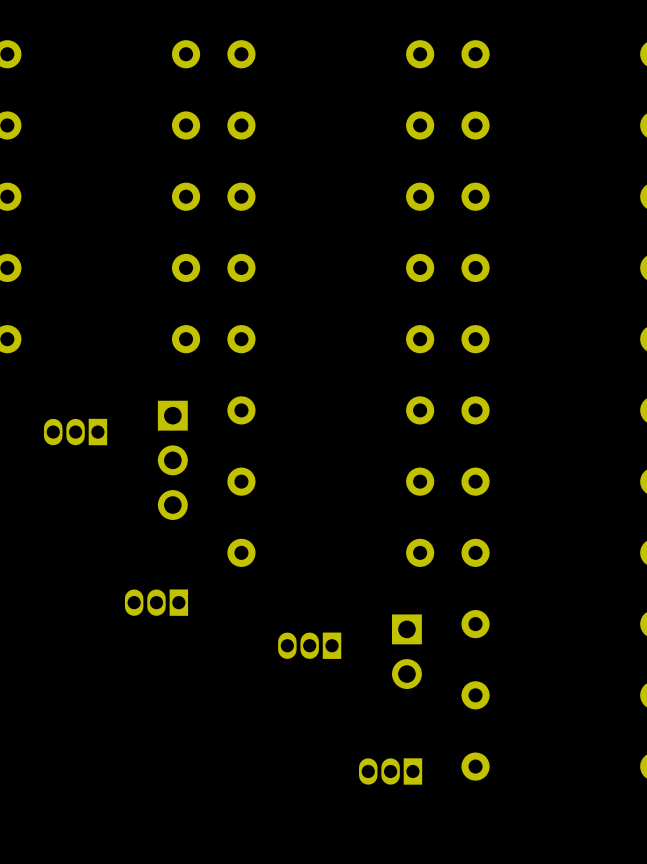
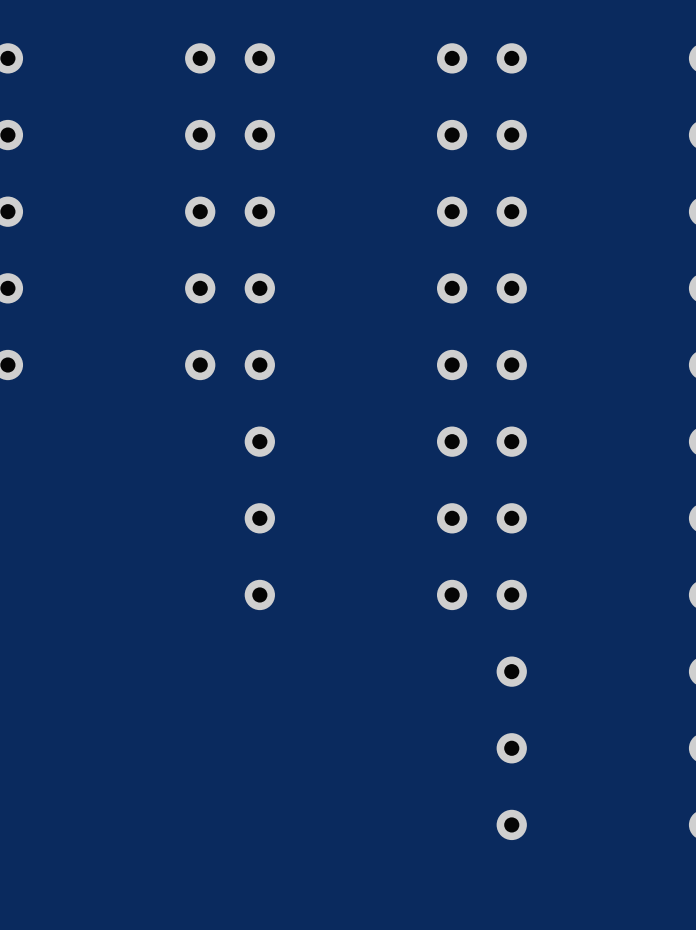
part: (75, 432) -> none
part: (172, 460) -> none
part: (156, 602) -> none
part: (309, 645) -> none
part: (406, 651) -> none
part: (390, 771) -> none

